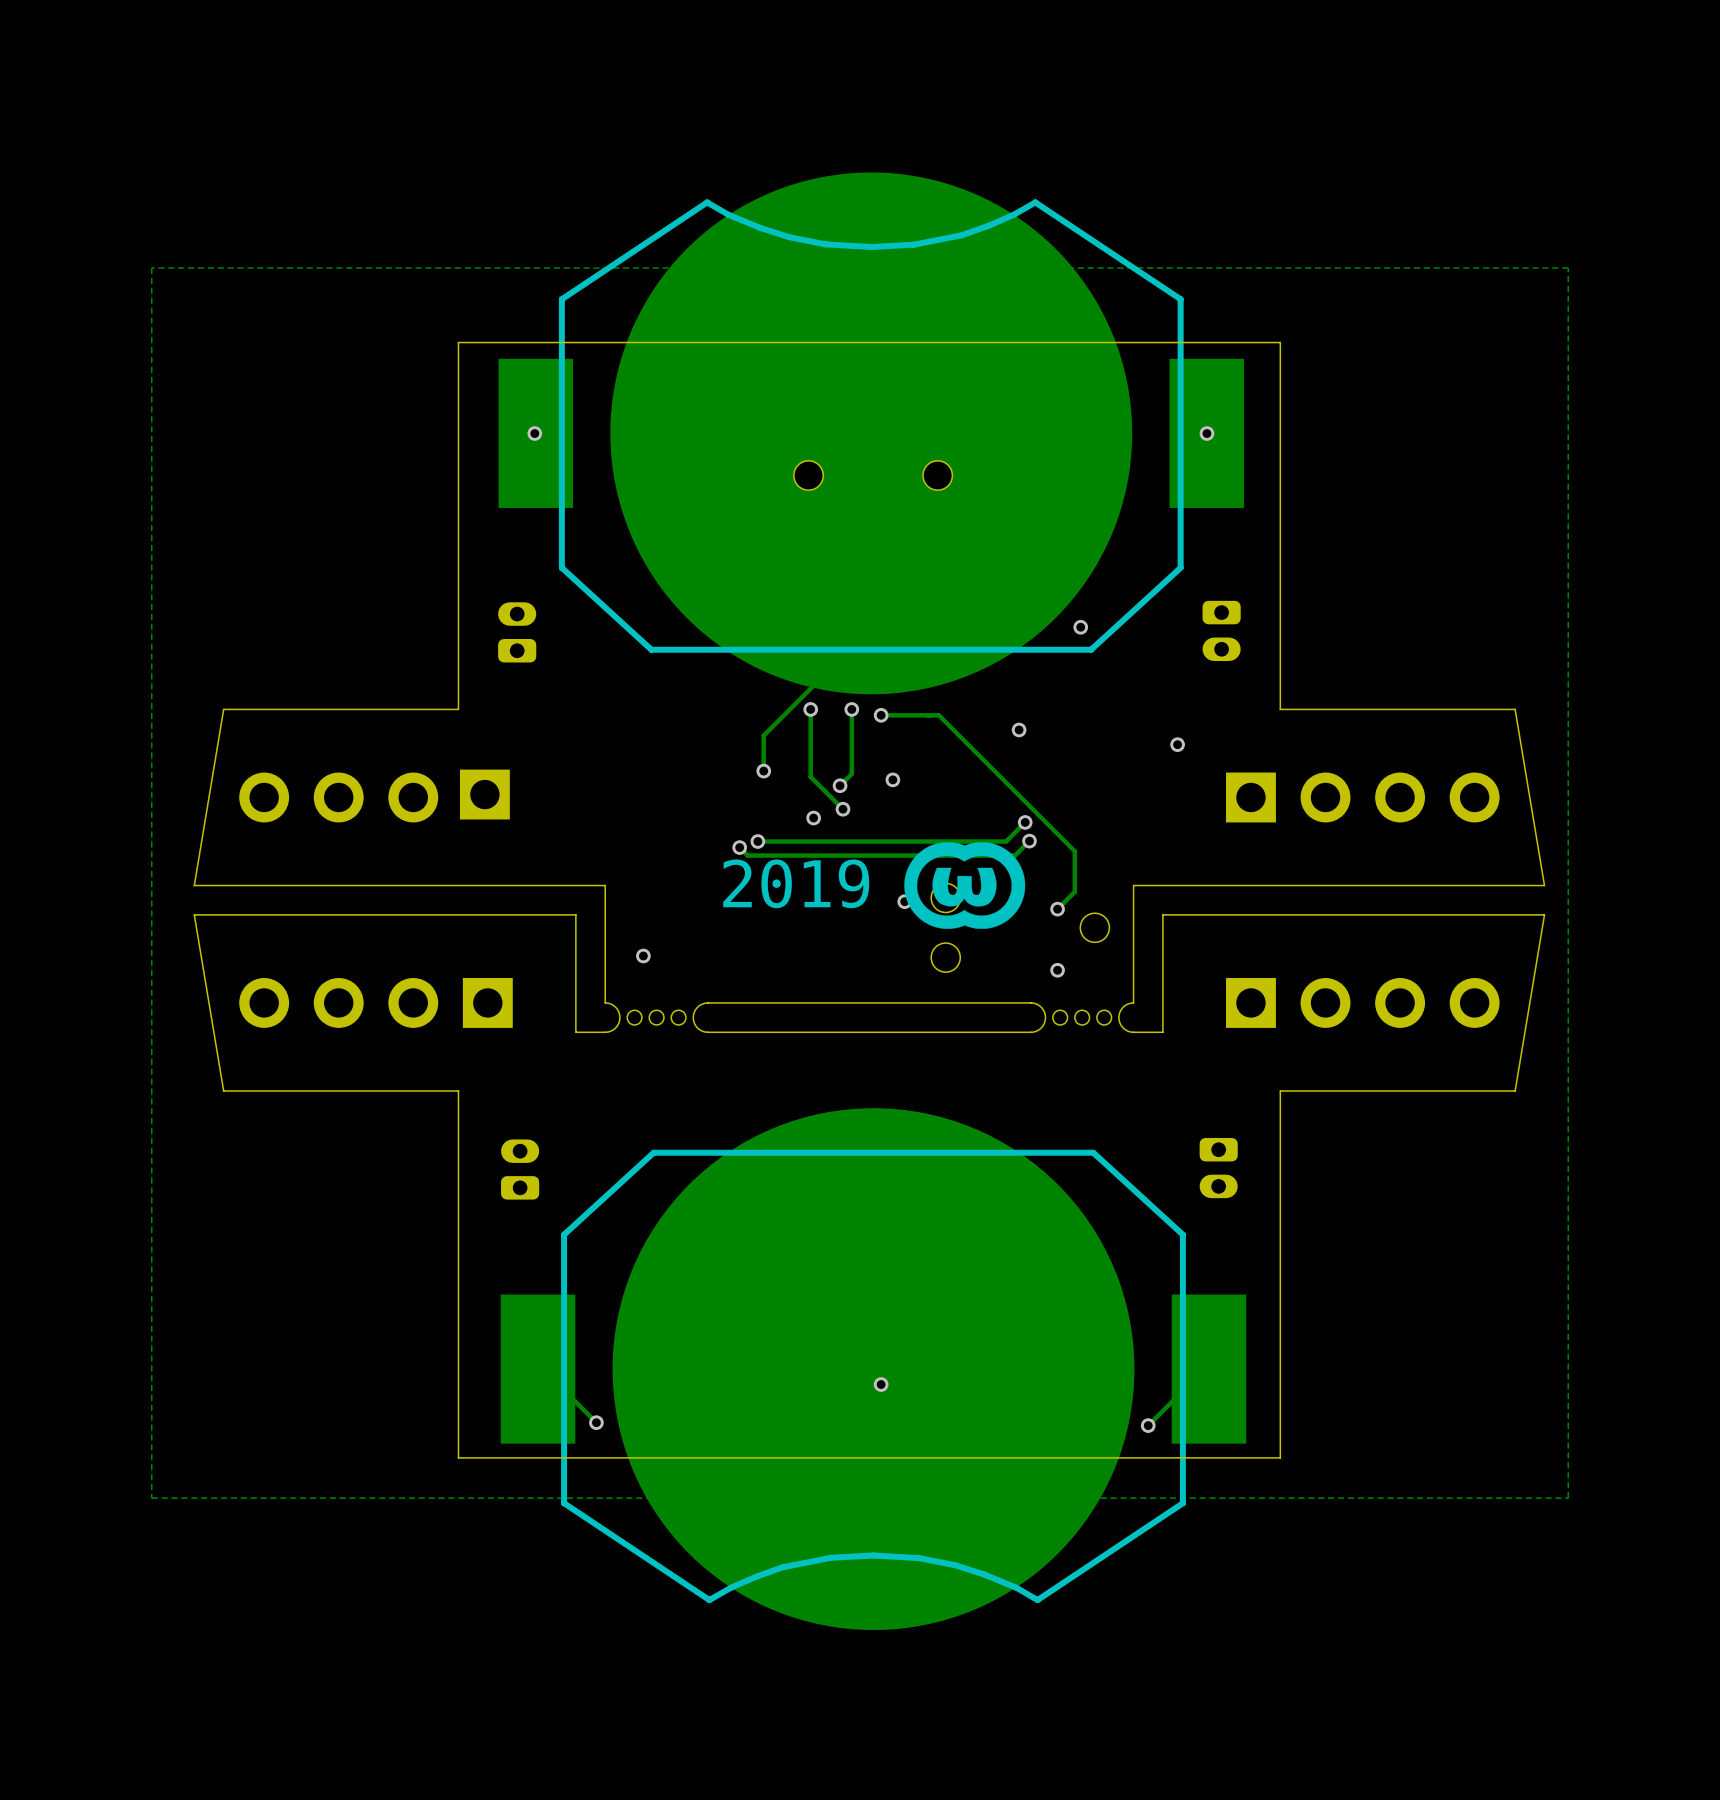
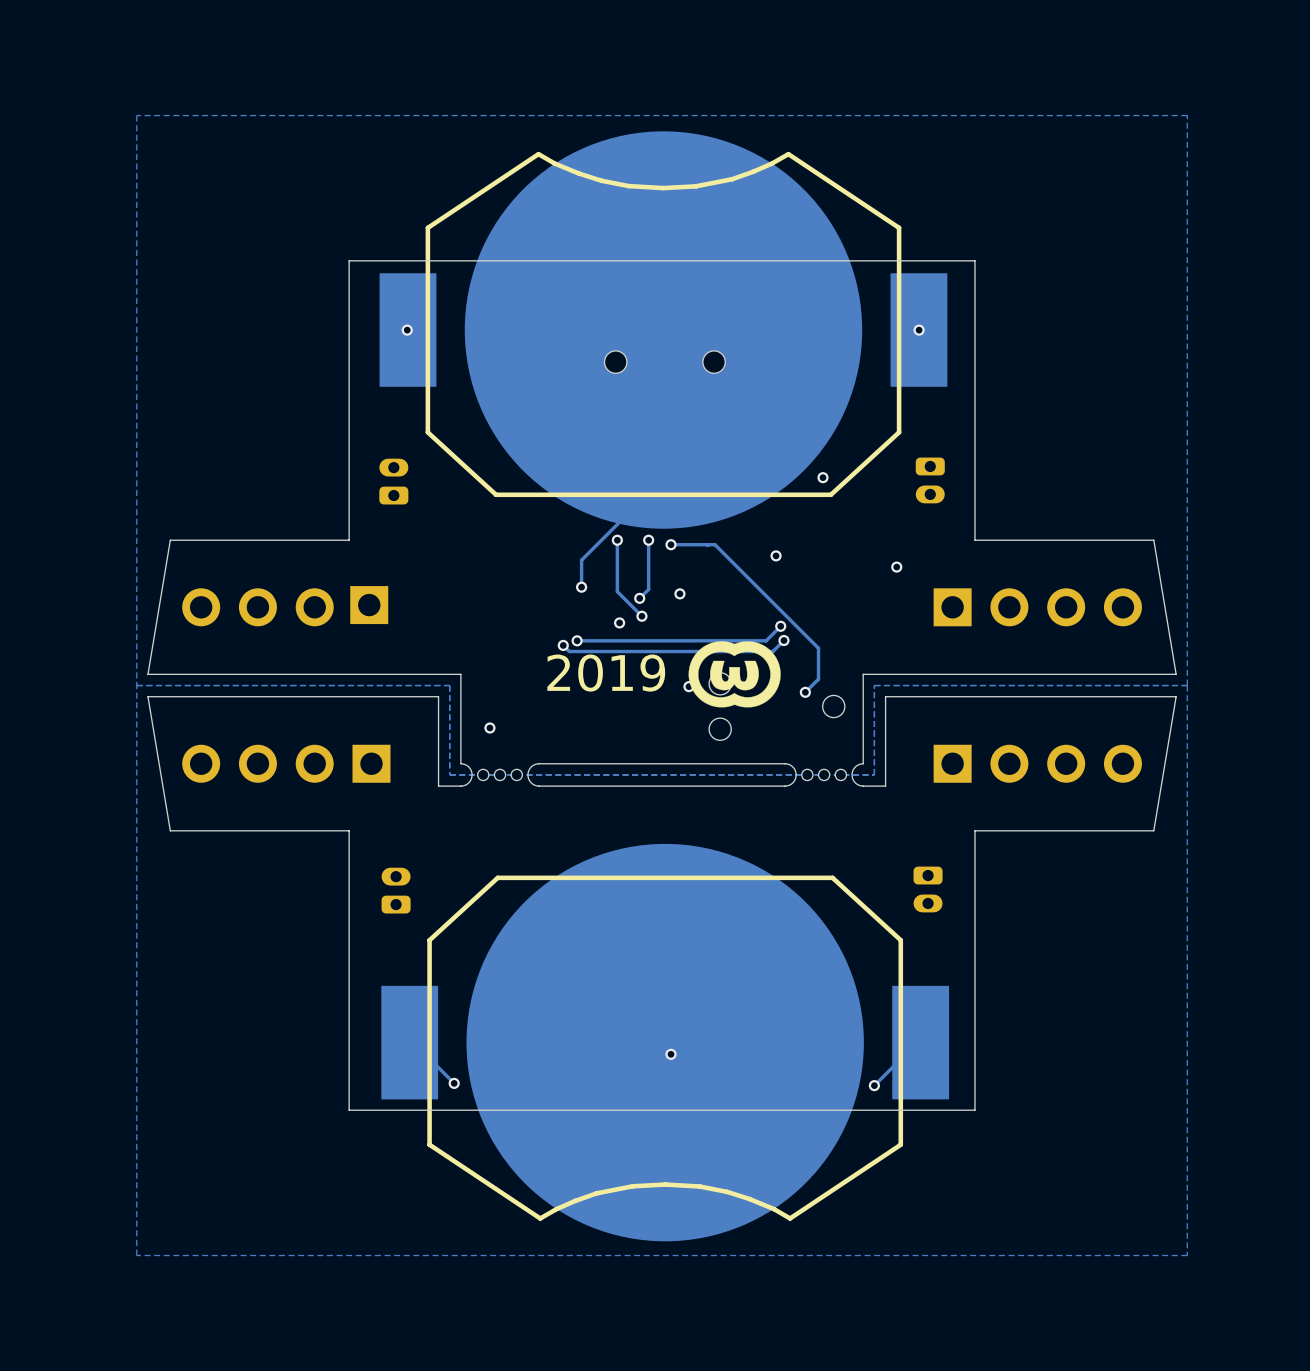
zone outline: (1568, 267) (1568, 1498) (151, 1498) (151, 267) (1568, 267) -> (1187, 115) (1187, 1255) (136, 1255) (136, 115) (1187, 115)
zone outline: none -> (1187, 685) (874, 685) (874, 774) (449, 774) (449, 685) (136, 685)
via: (1057, 970) -> none

